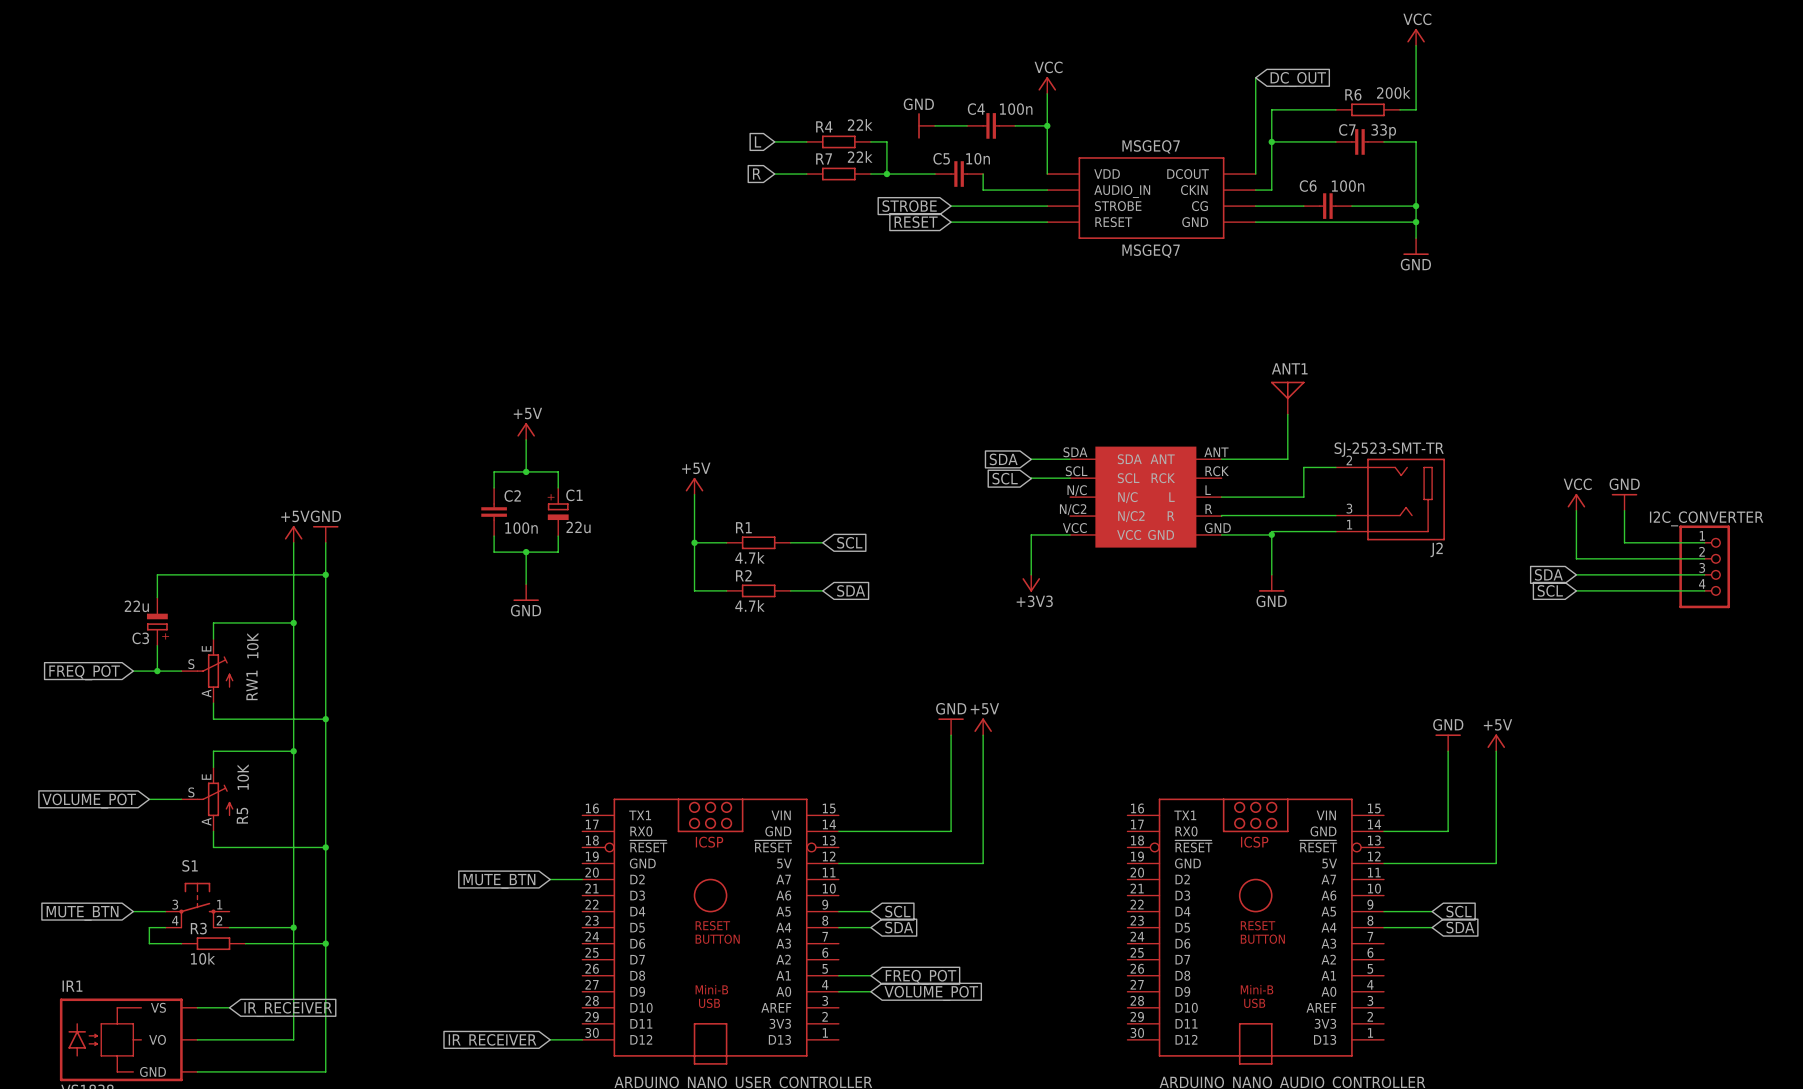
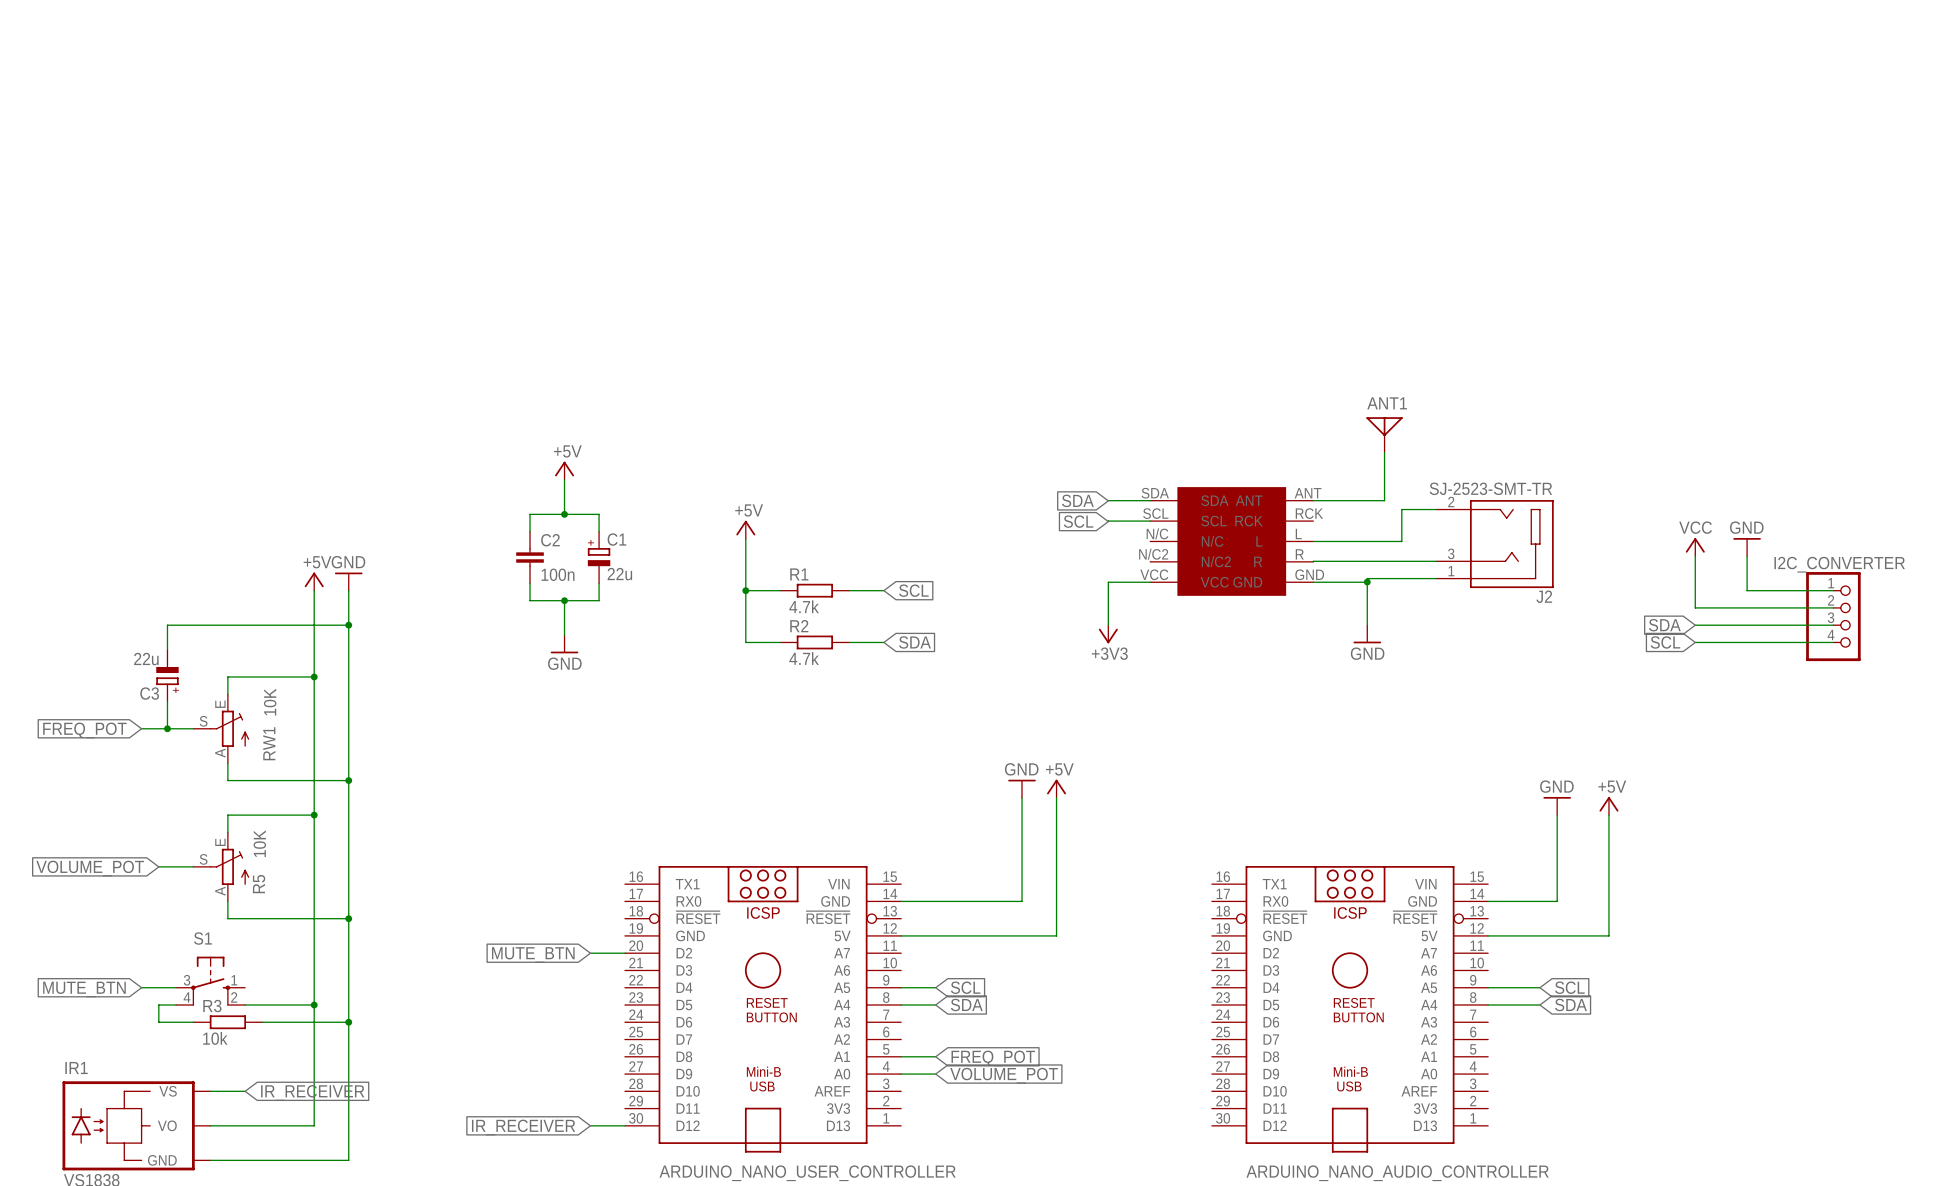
power symbol: VCC (1416, 37) -> none
wire: (1416, 45) (1416, 109) (1400, 109) -> none
wire: (1255, 77) (1255, 174) -> none
global label: DC_OUT (1298, 79) -> none
power symbol: VCC (1047, 85) -> none
wire: (1047, 93) (1047, 174) -> none
wire: (1335, 109) (1271, 109) (1271, 190) (1255, 190) -> none
R6: 200k (1367, 109) -> none
power symbol: GND (926, 125) -> none
wire: (935, 125) (967, 125) -> none
C4: 100n (991, 125) -> none
wire: (1015, 125) (1047, 125) -> none
junction: (1047, 125) -> none
global label: L (758, 141) -> none
wire: (774, 141) (806, 141) -> none
R4: 22k (838, 141) -> none
wire: (870, 141) (886, 141) (886, 174) -> none
wire: (1271, 141) (1335, 141) -> none
junction: (1271, 141) -> none
C7: 33p (1359, 141) -> none
wire: (1384, 141) (1416, 141) (1416, 238) -> none
global label: R (756, 174) -> none
wire: (774, 174) (806, 174) -> none
R7: 22k (838, 174) -> none
wire: (870, 174) (935, 174) -> none
junction: (886, 174) -> none
C5: 10n (959, 174) -> none
wire: (983, 174) (983, 190) (1047, 190) -> none
MSGEQ7: (1151, 198) -> none
global label: STROBE (909, 206) -> none
wire: (951, 206) (1047, 206) -> none
wire: (1255, 206) (1303, 206) -> none
C6: 100n (1327, 206) -> none
wire: (1351, 206) (1416, 206) -> none
junction: (1416, 206) -> none
global label: RESET (916, 222) -> none
wire: (951, 222) (1047, 222) -> none
wire: (1255, 222) (1416, 222) -> none
junction: (1416, 222) -> none
power symbol: GND (1416, 246) -> none

